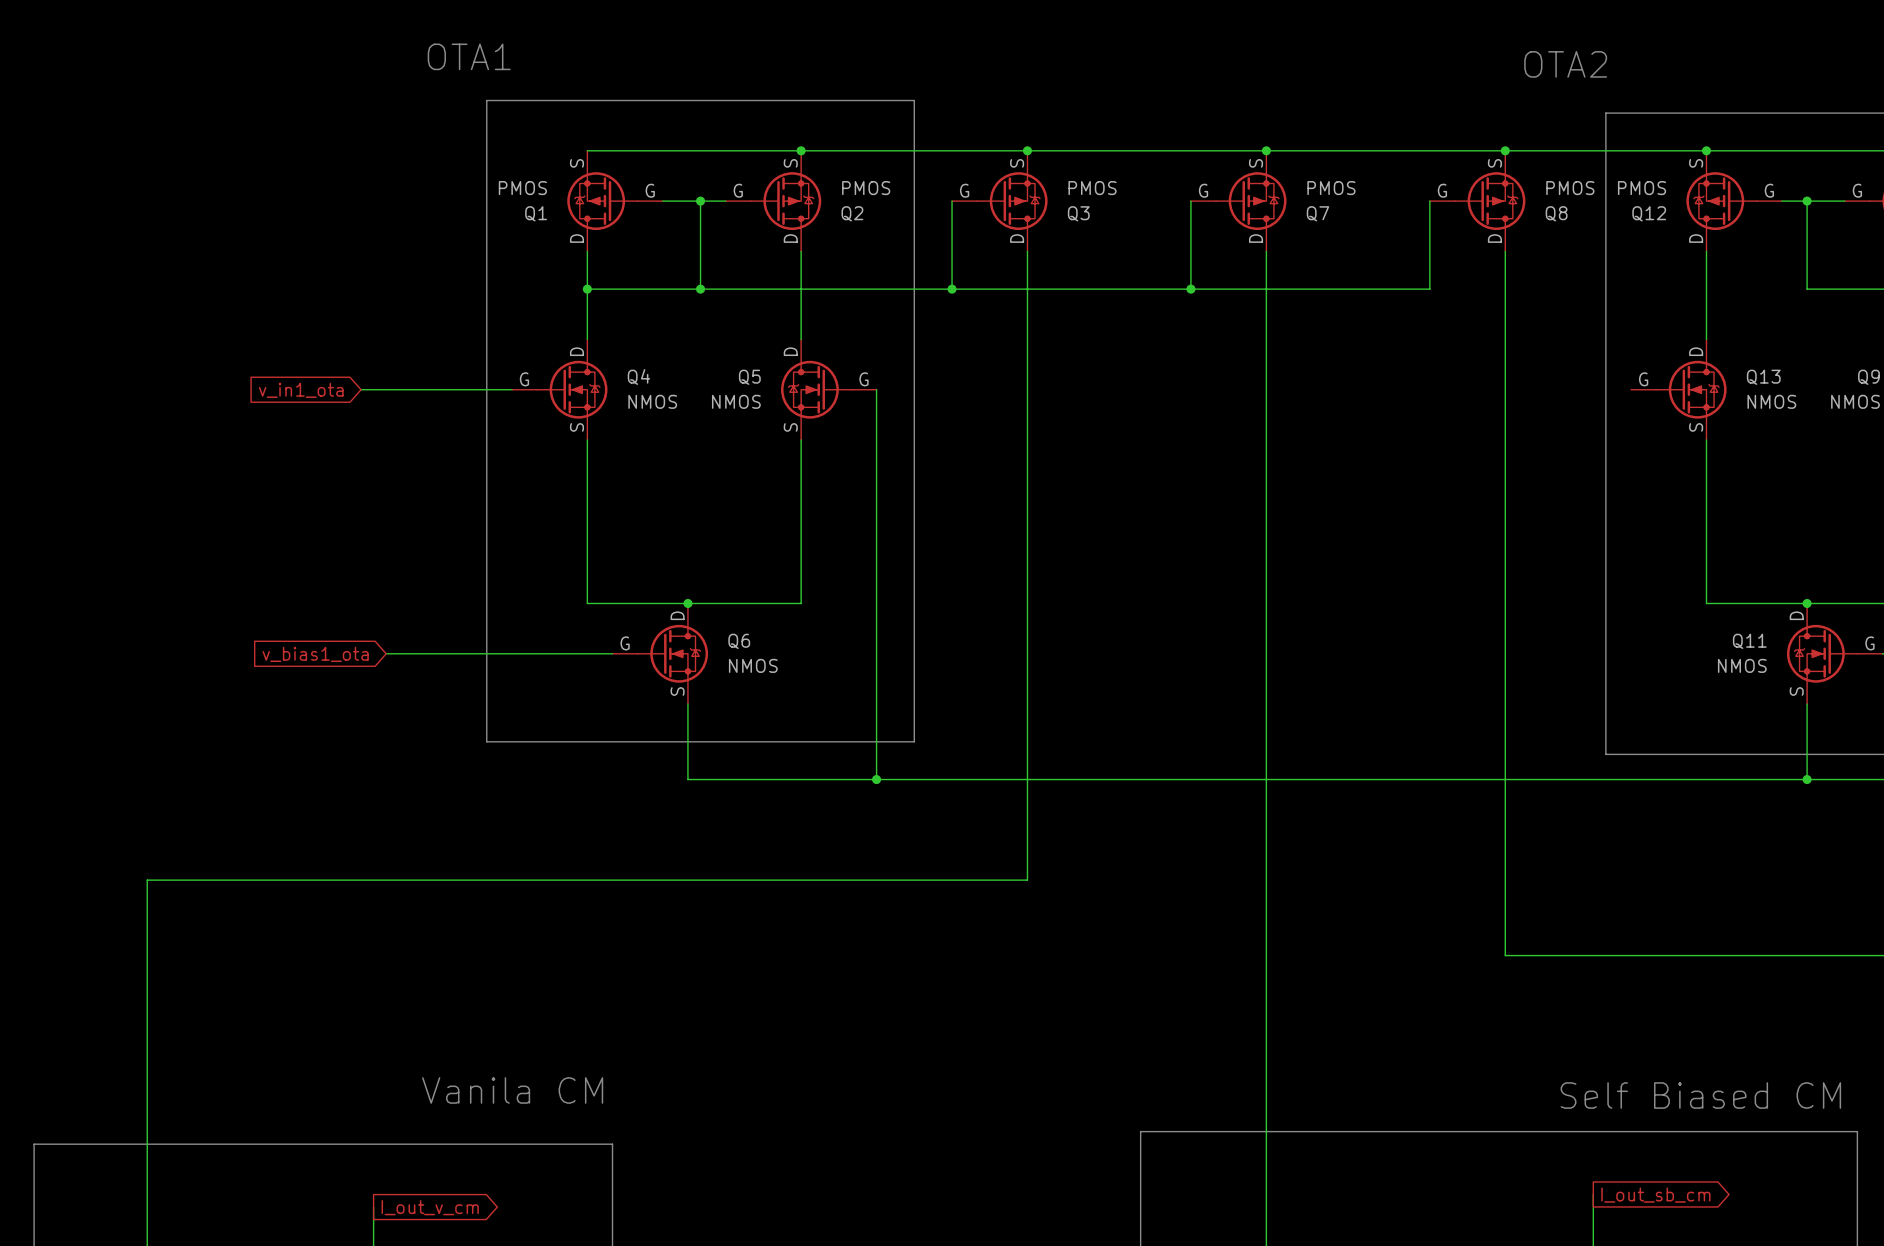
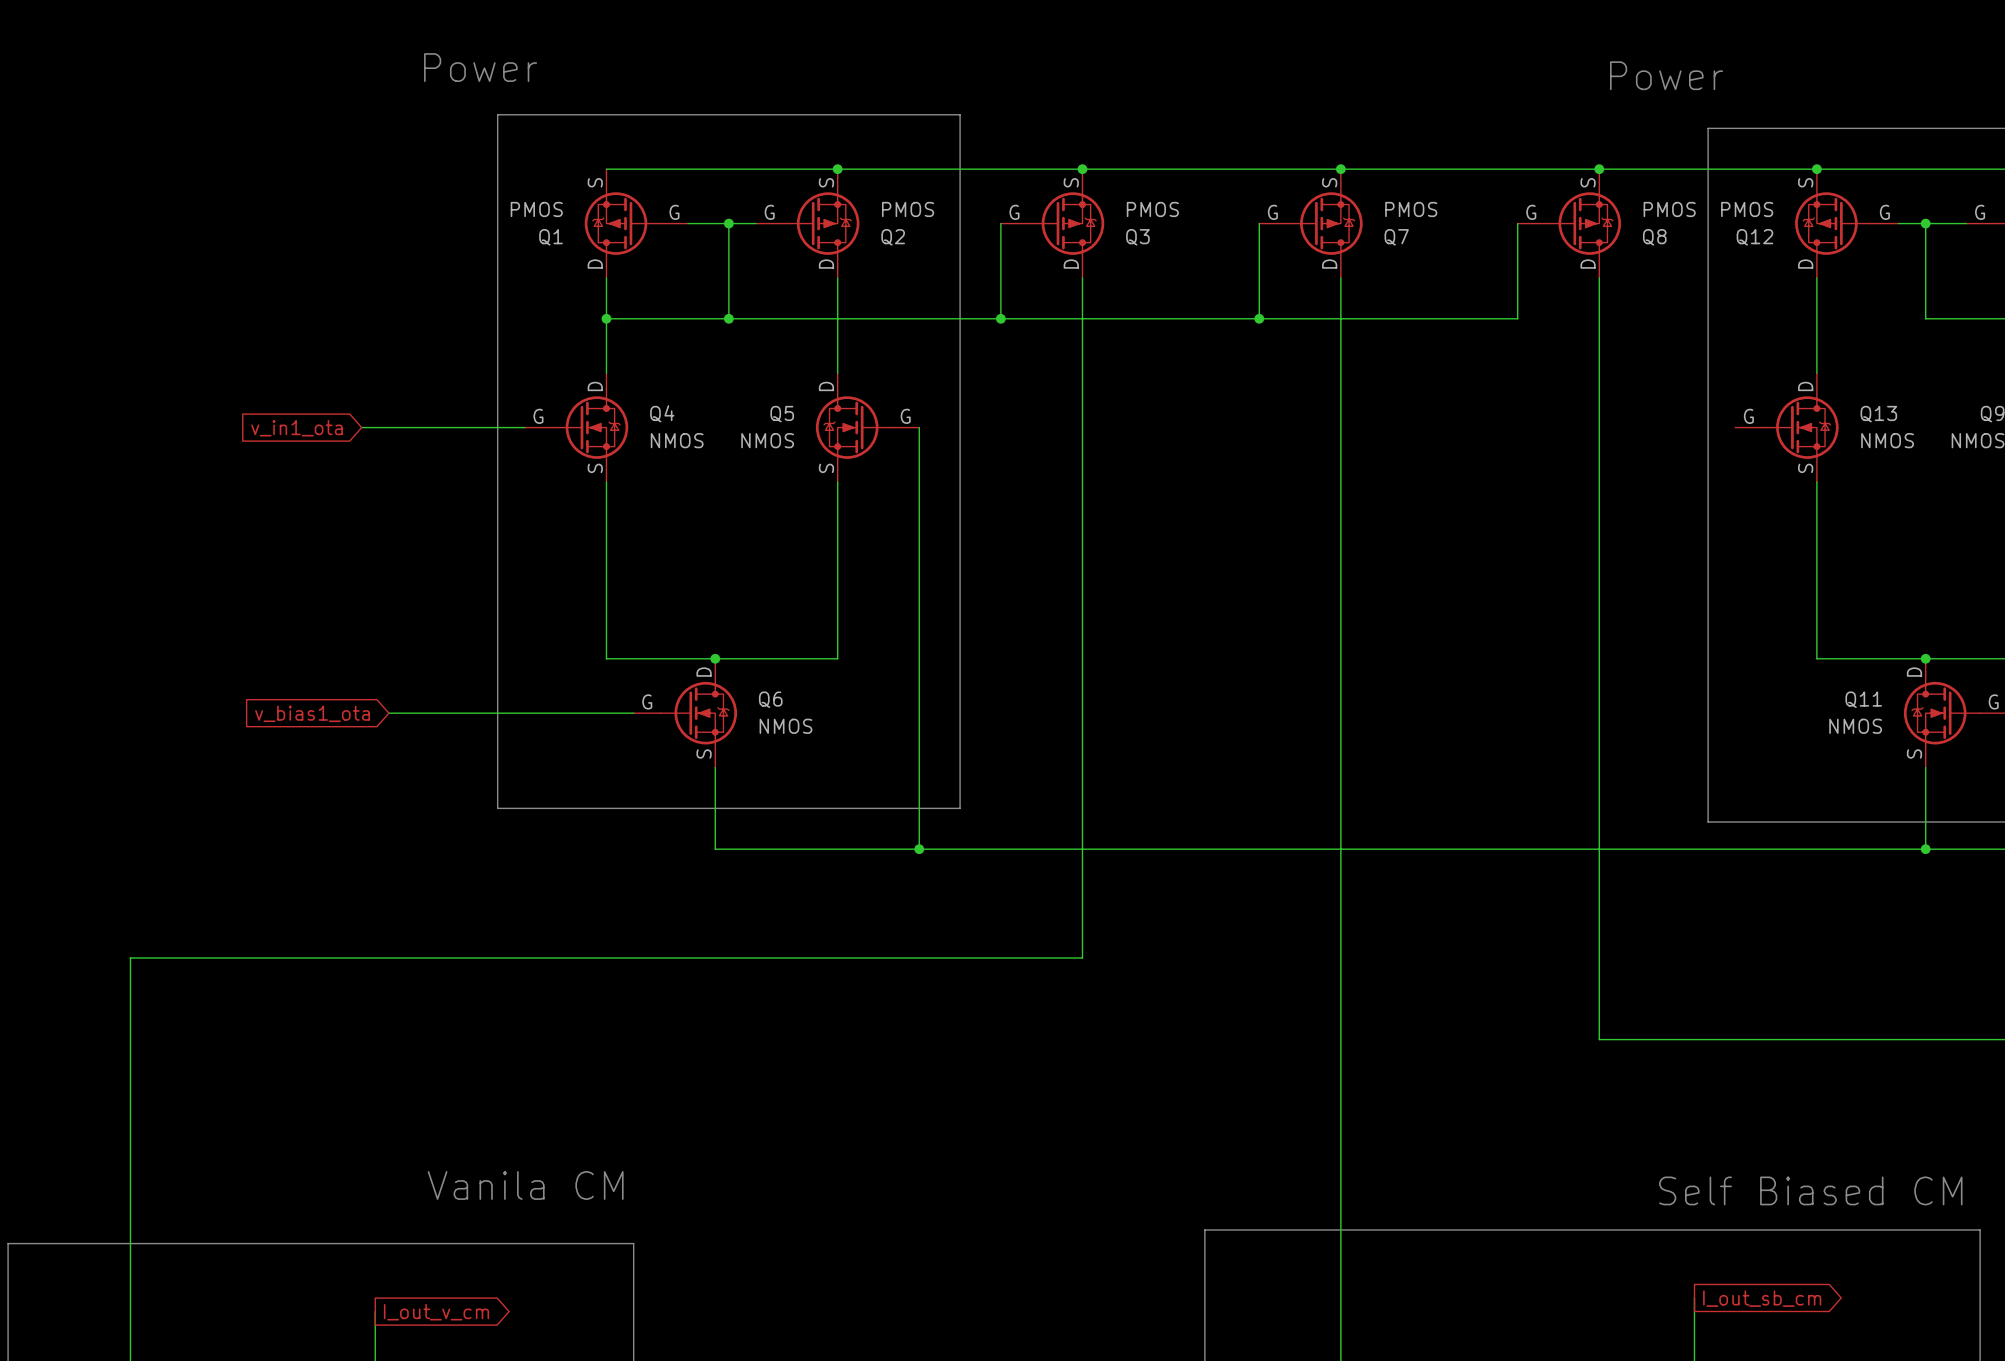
text: OTA1 (469, 56) -> Power (480, 67)
text: OTA2 (1565, 64) -> Power (1666, 75)

